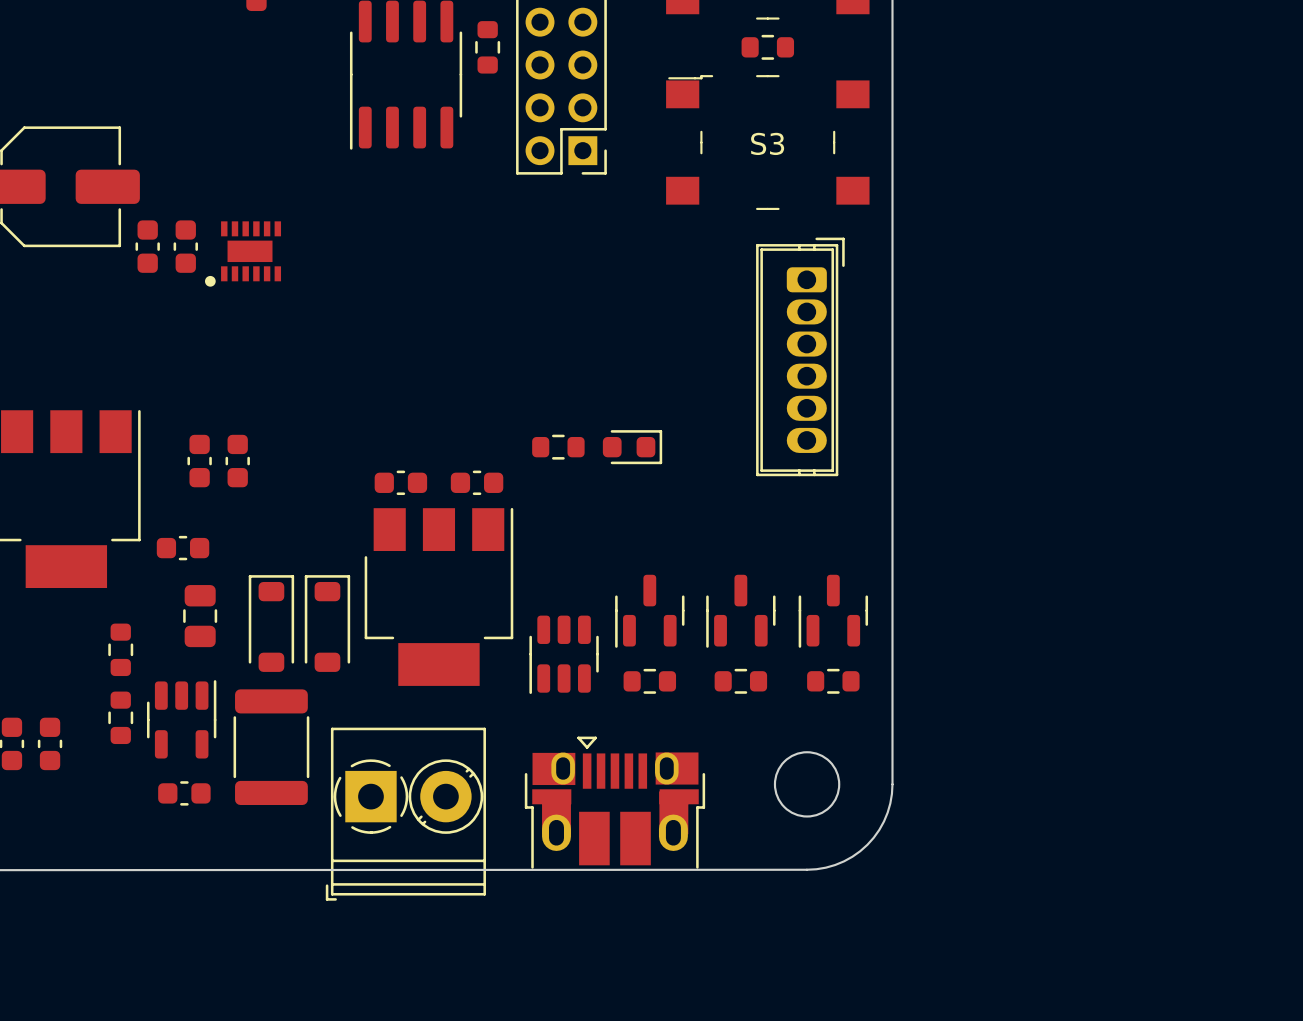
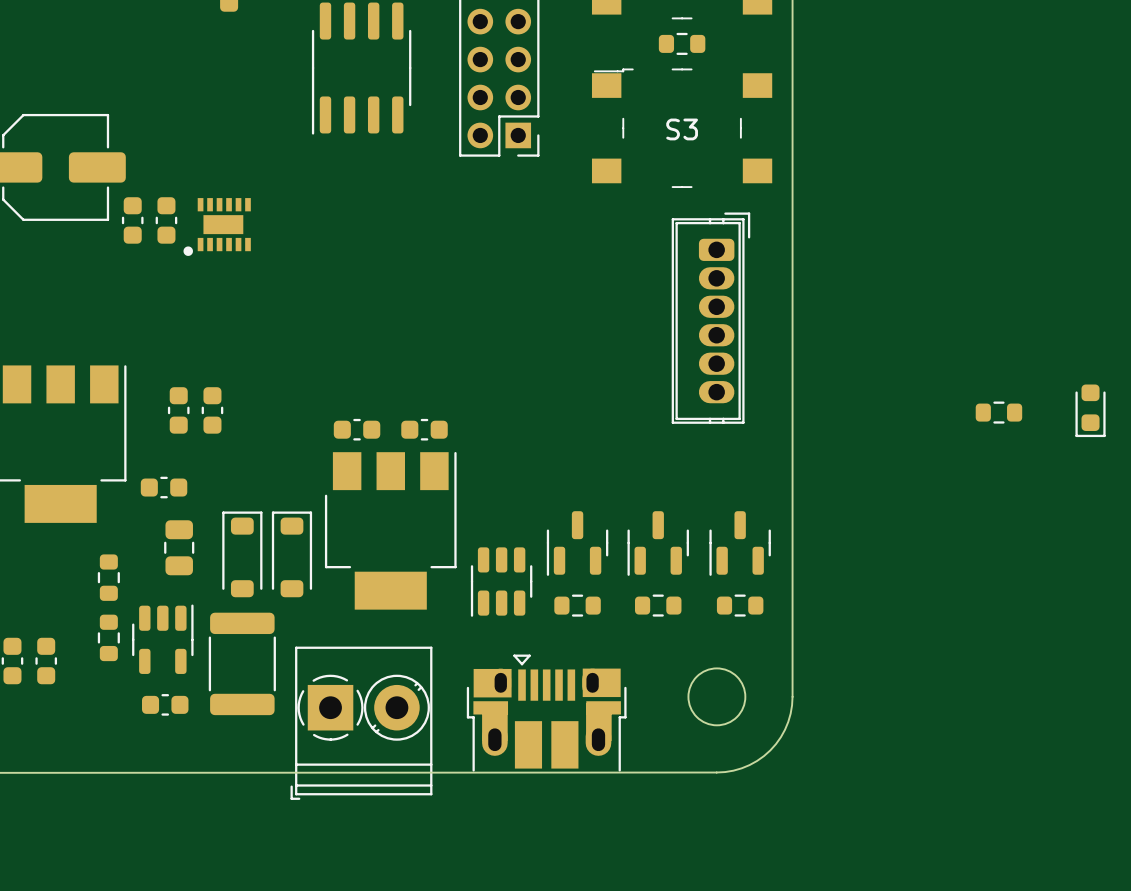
part: (487, 47) -> none
part: (558, 447) -> none
part: (632, 447) -> none
part: none -> (1090, 410)
part: none -> (998, 412)

